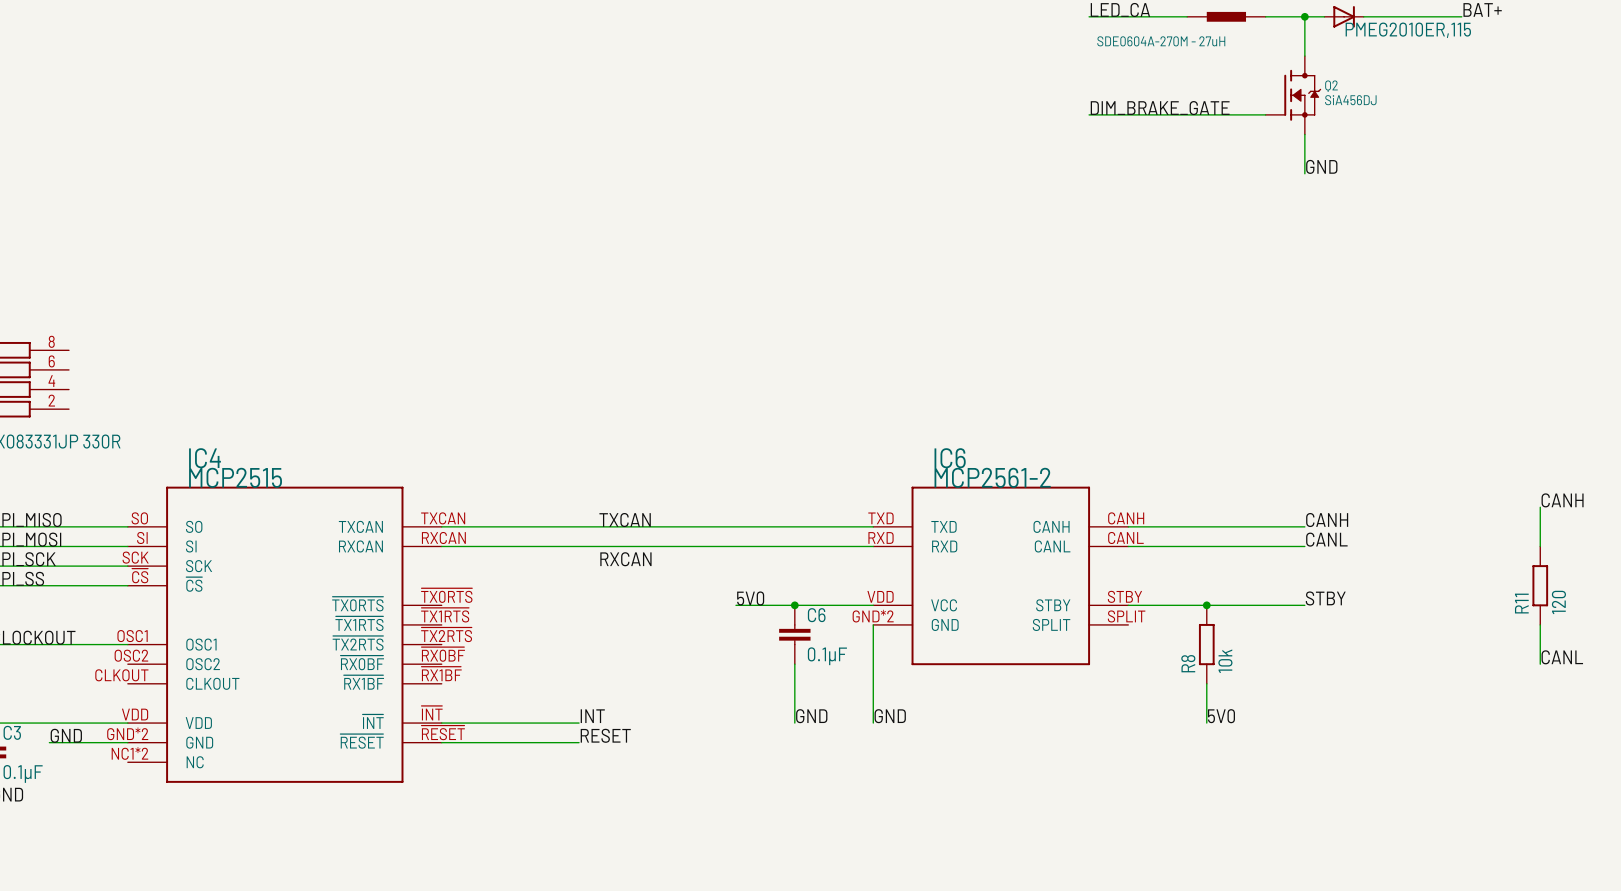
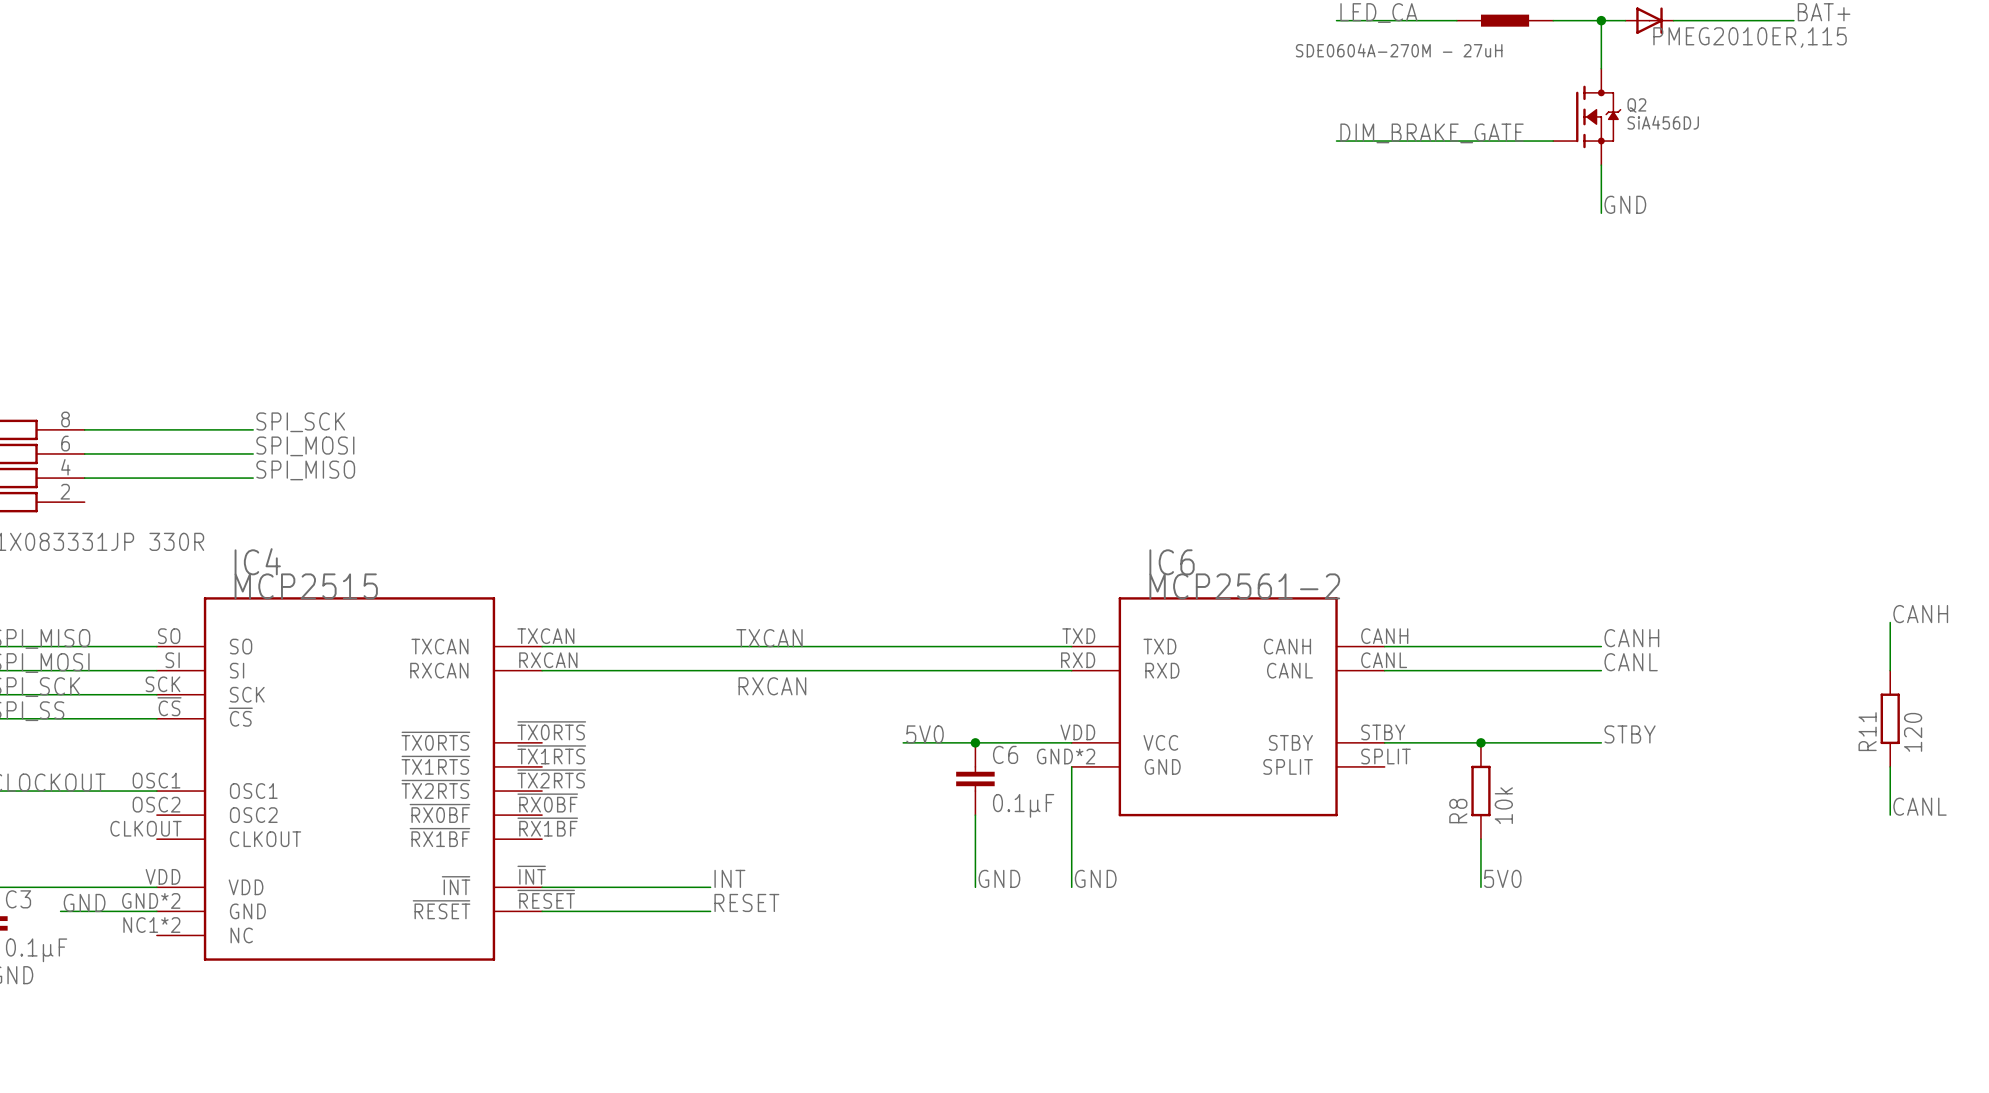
label: none -> SPI_SCK (300, 422)
wire: none -> (84, 429) (253, 429)
label: none -> SPI_MOSI (305, 446)
wire: none -> (84, 453) (253, 453)
label: none -> SPI_MISO (305, 470)
wire: none -> (84, 478) (253, 478)

